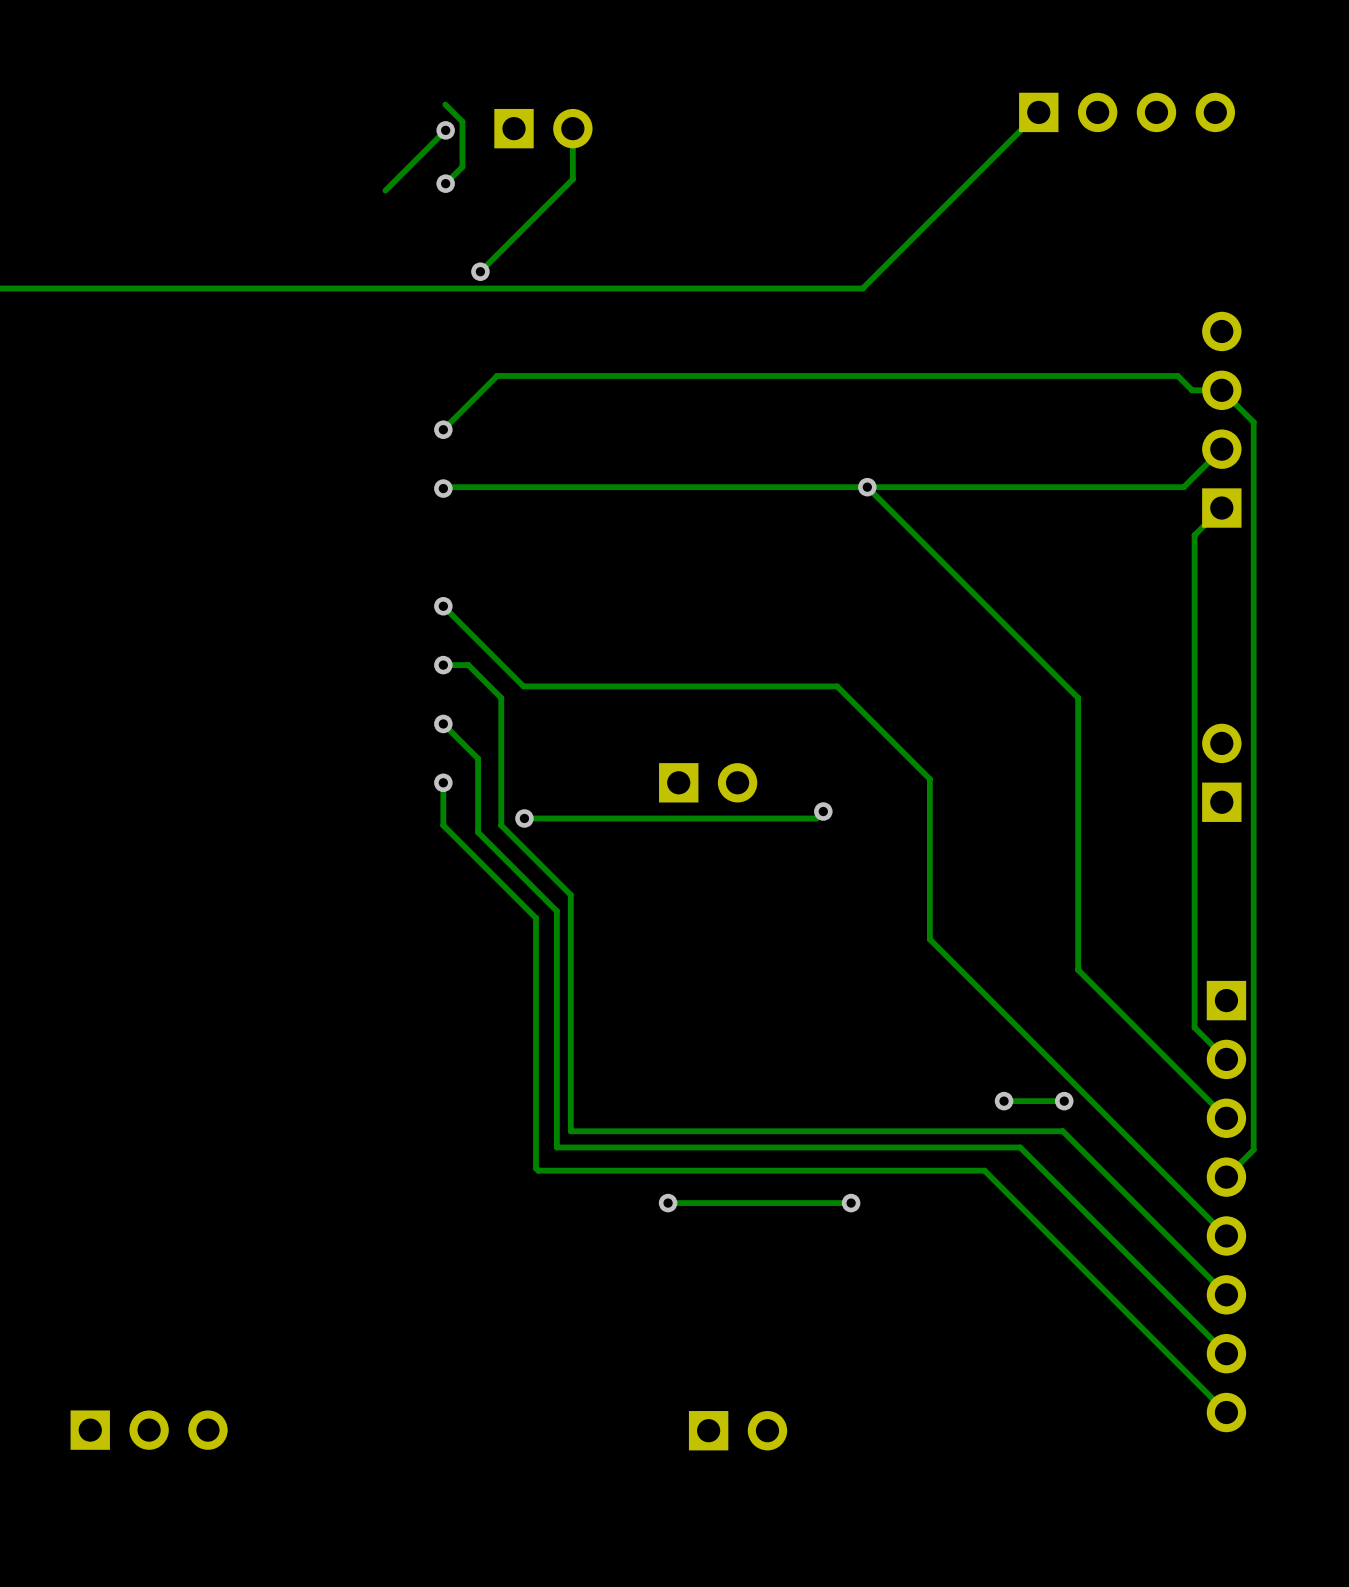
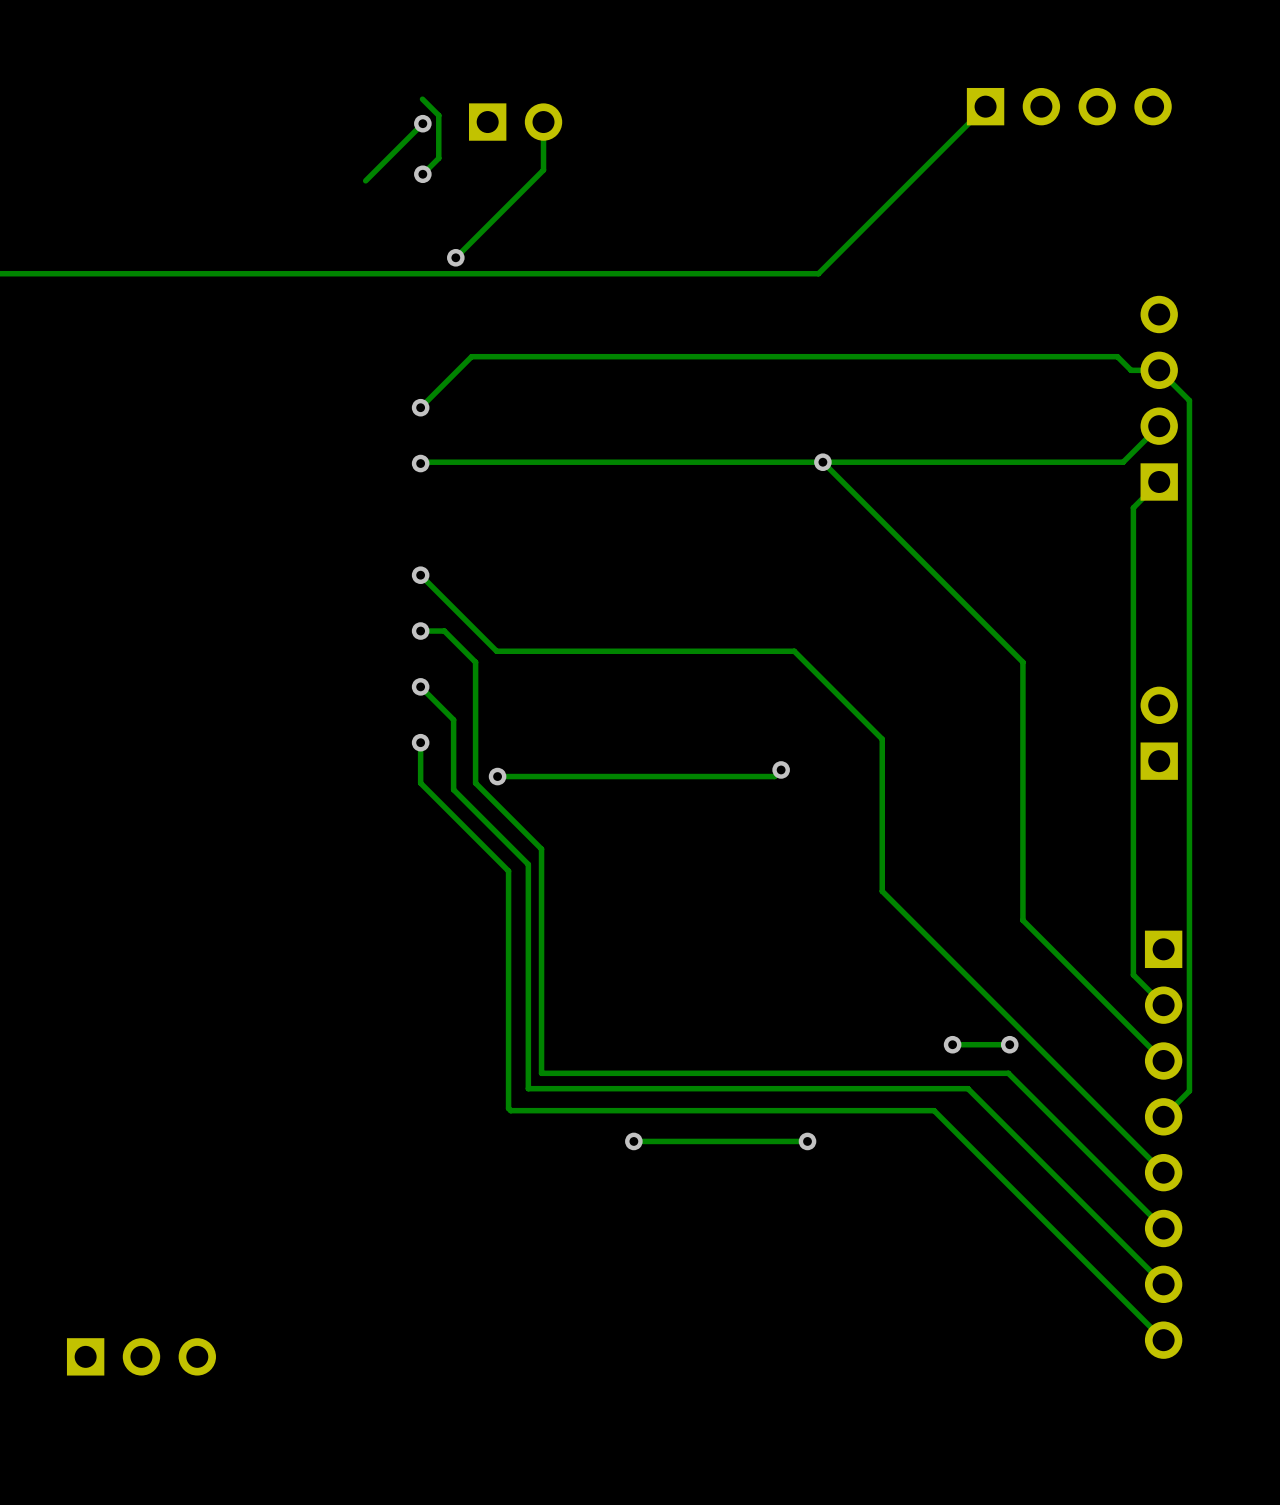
part: (708, 782) -> none
part: (738, 1430) -> none

